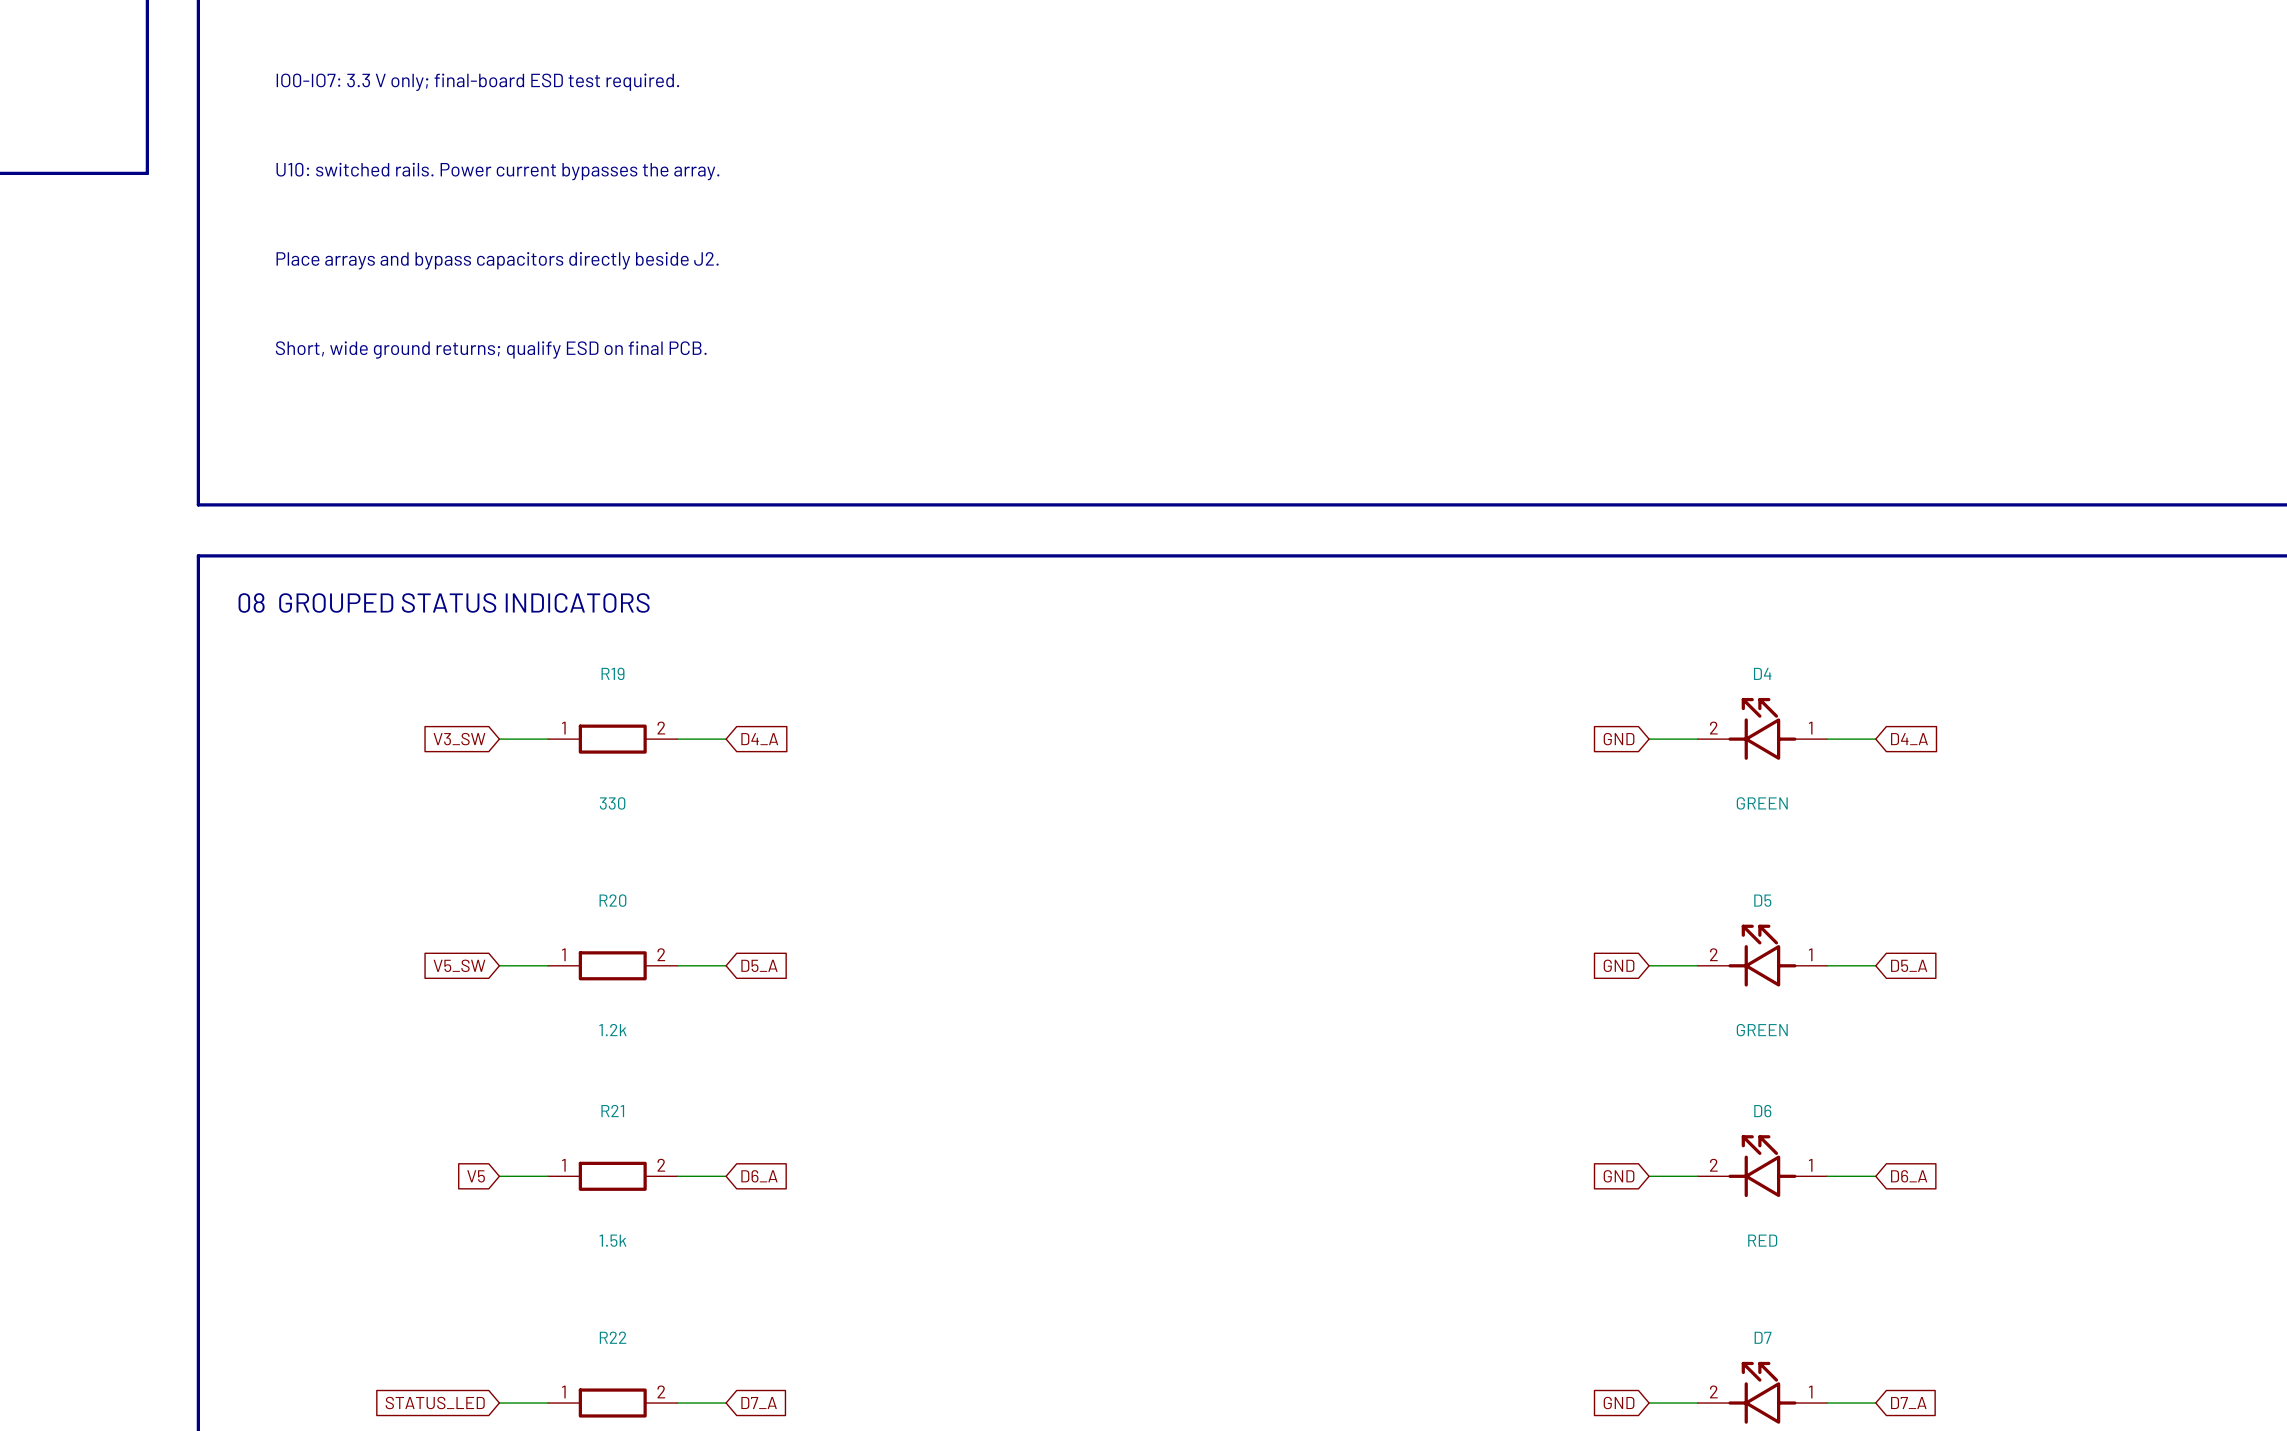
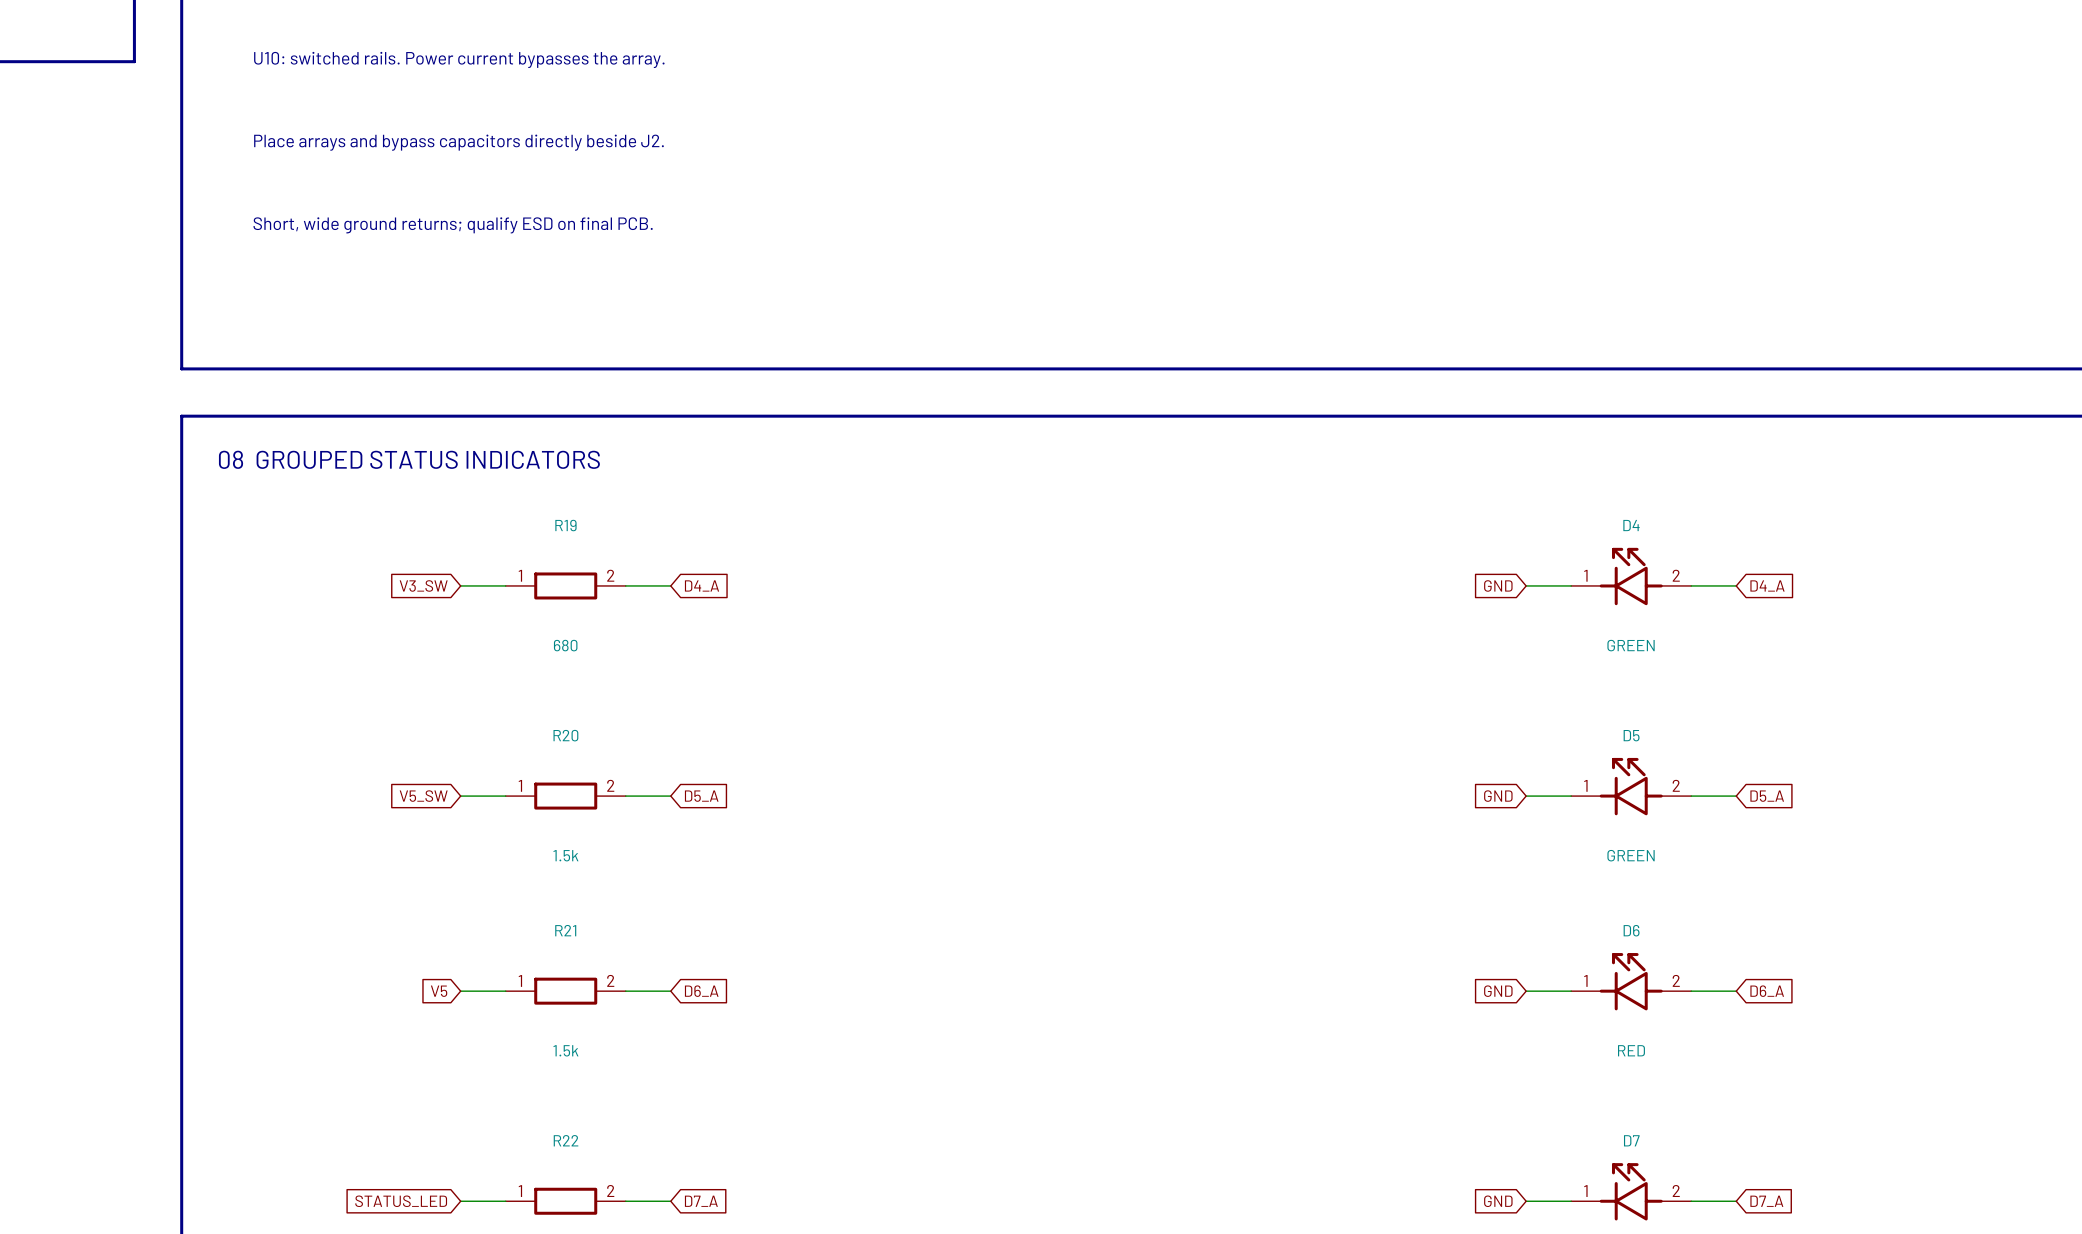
D4 pin number: 2 (1713, 728) -> 1 (1585, 575)
D4 pin number: 1 (1810, 728) -> 2 (1676, 575)
R19 value: 330 (612, 803) -> 680 (565, 645)
D5 pin number: 2 (1713, 954) -> 1 (1585, 785)
D5 pin number: 1 (1810, 954) -> 2 (1676, 785)
R20 value: 1.2k (612, 1030) -> 1.5k (565, 855)
D6 pin number: 2 (1713, 1165) -> 1 (1585, 980)
D6 pin number: 1 (1810, 1165) -> 2 (1676, 980)
D7 pin number: 2 (1713, 1391) -> 1 (1585, 1191)
D7 pin number: 1 (1810, 1392) -> 2 (1676, 1190)

